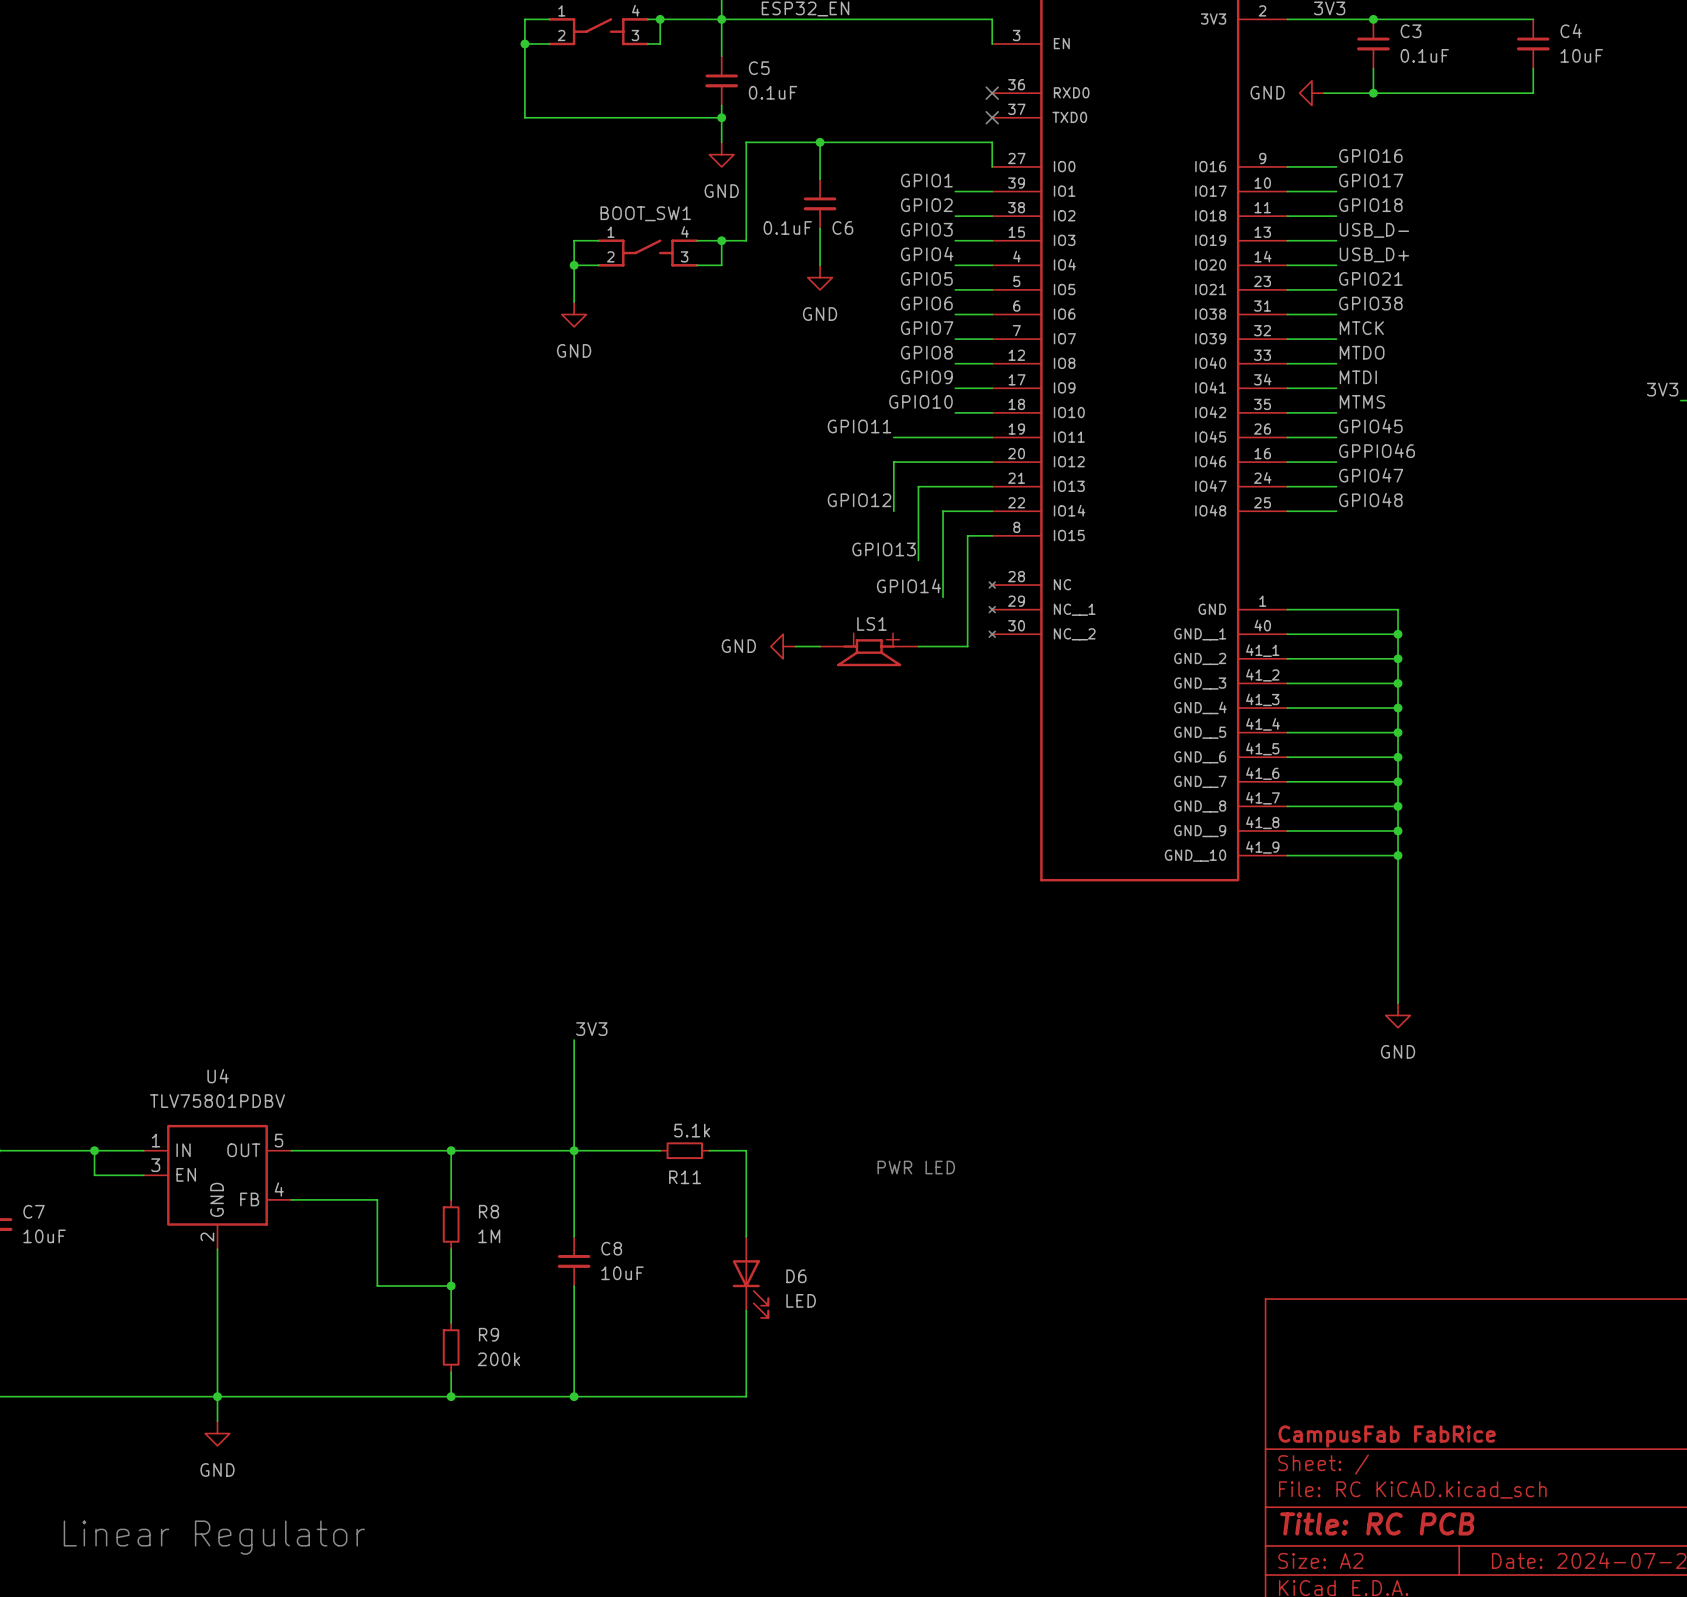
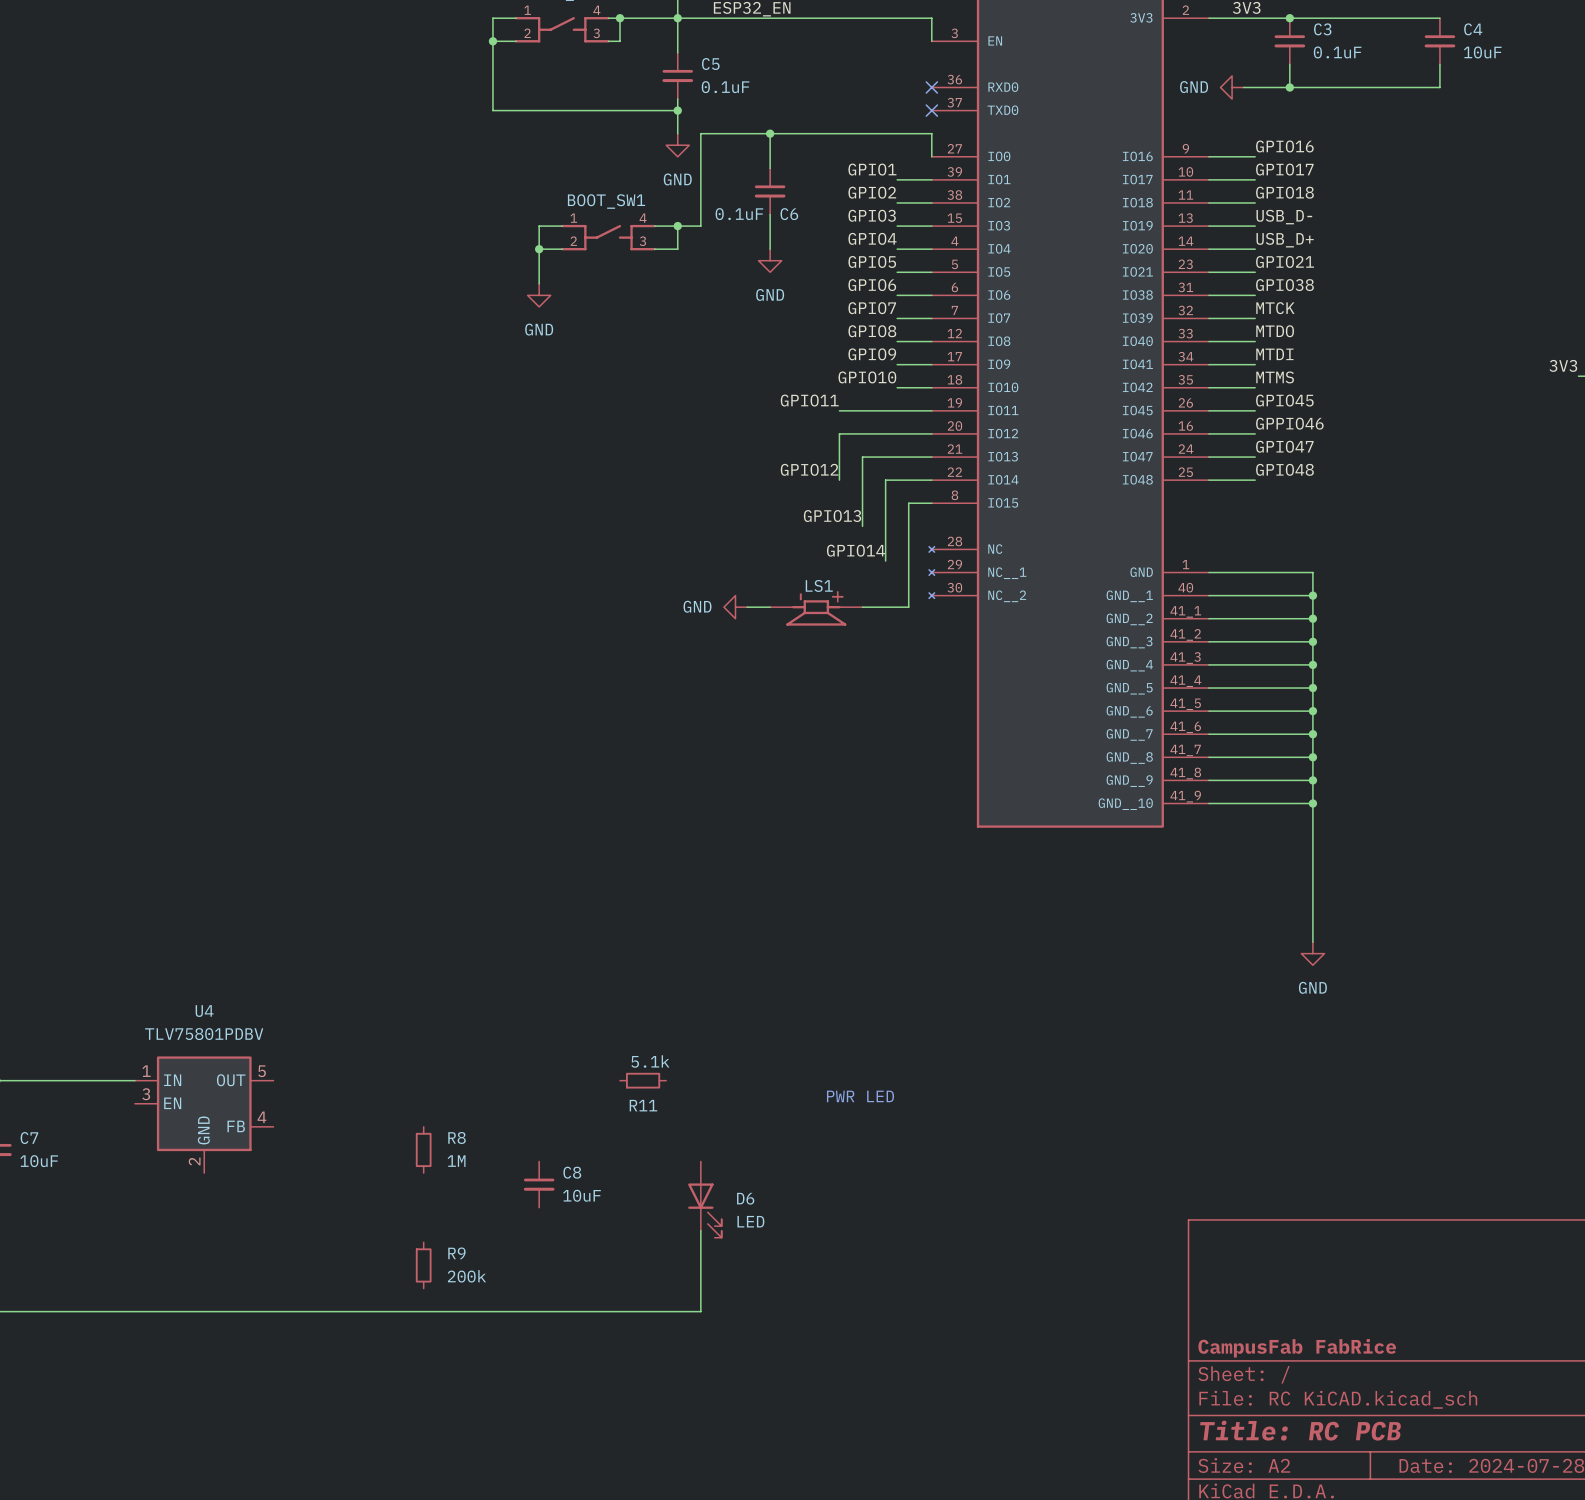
label: 3V3 (591, 1029) -> none
wire: (574, 1040) (574, 1236) -> none
wire: (94, 1150) (94, 1175) (143, 1175) -> none
junction: (94, 1150) -> none
wire: (291, 1150) (660, 1150) -> none
wire: (451, 1150) (451, 1199) -> none
junction: (451, 1150) -> none
junction: (574, 1150) -> none
wire: (709, 1150) (746, 1150) (746, 1236) -> none
wire: (291, 1199) (377, 1199) (377, 1285) (451, 1285) -> none
wire: (217, 1249) (217, 1421) -> none
wire: (451, 1249) (451, 1322) -> none
junction: (451, 1285) -> none
wire: (574, 1285) (574, 1396) -> none
wire: (451, 1372) (451, 1396) -> none
junction: (217, 1396) -> none
junction: (451, 1396) -> none
junction: (574, 1396) -> none
power symbol: GND (217, 1433) -> none
text: Linear Regulator (214, 1537) -> none

